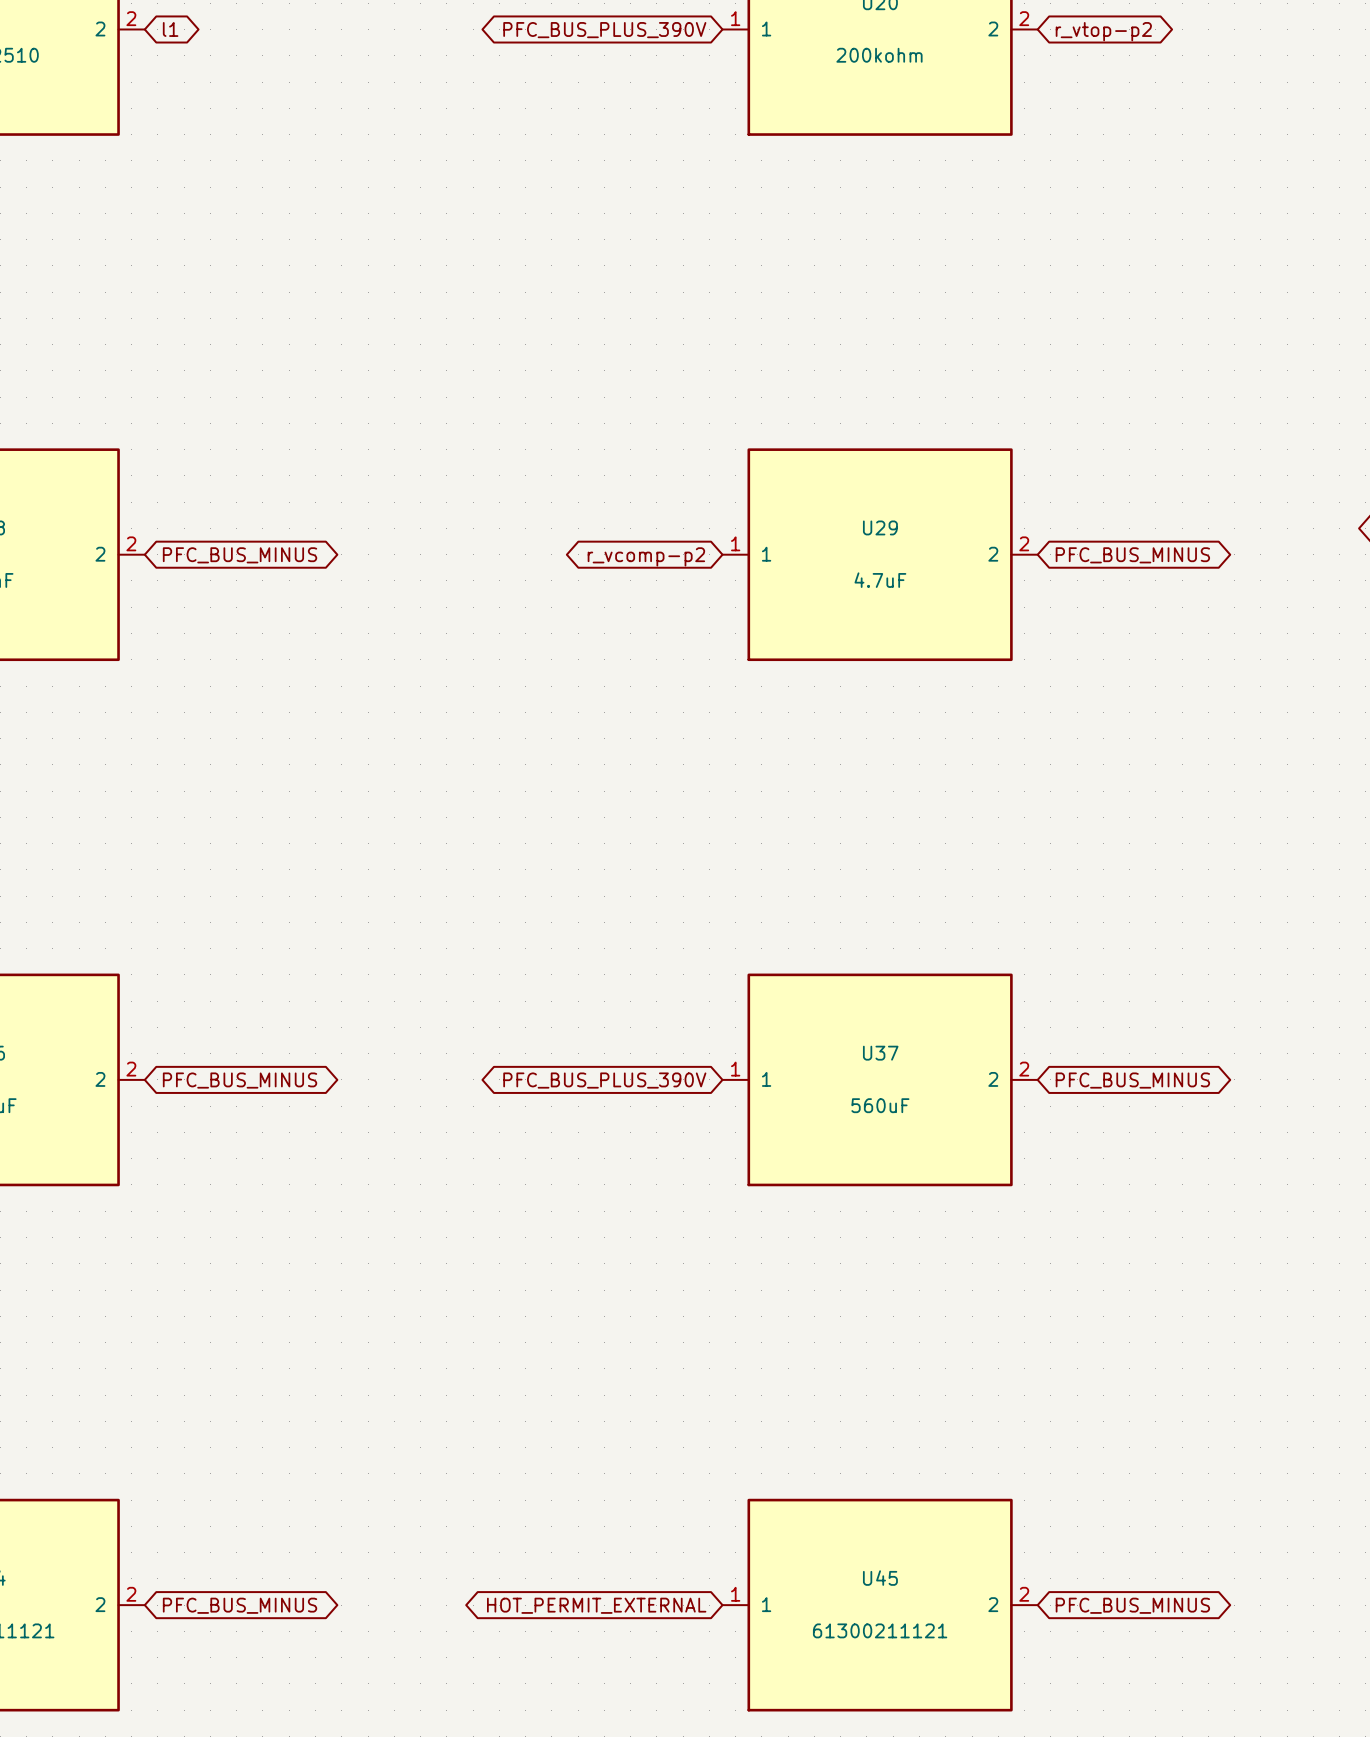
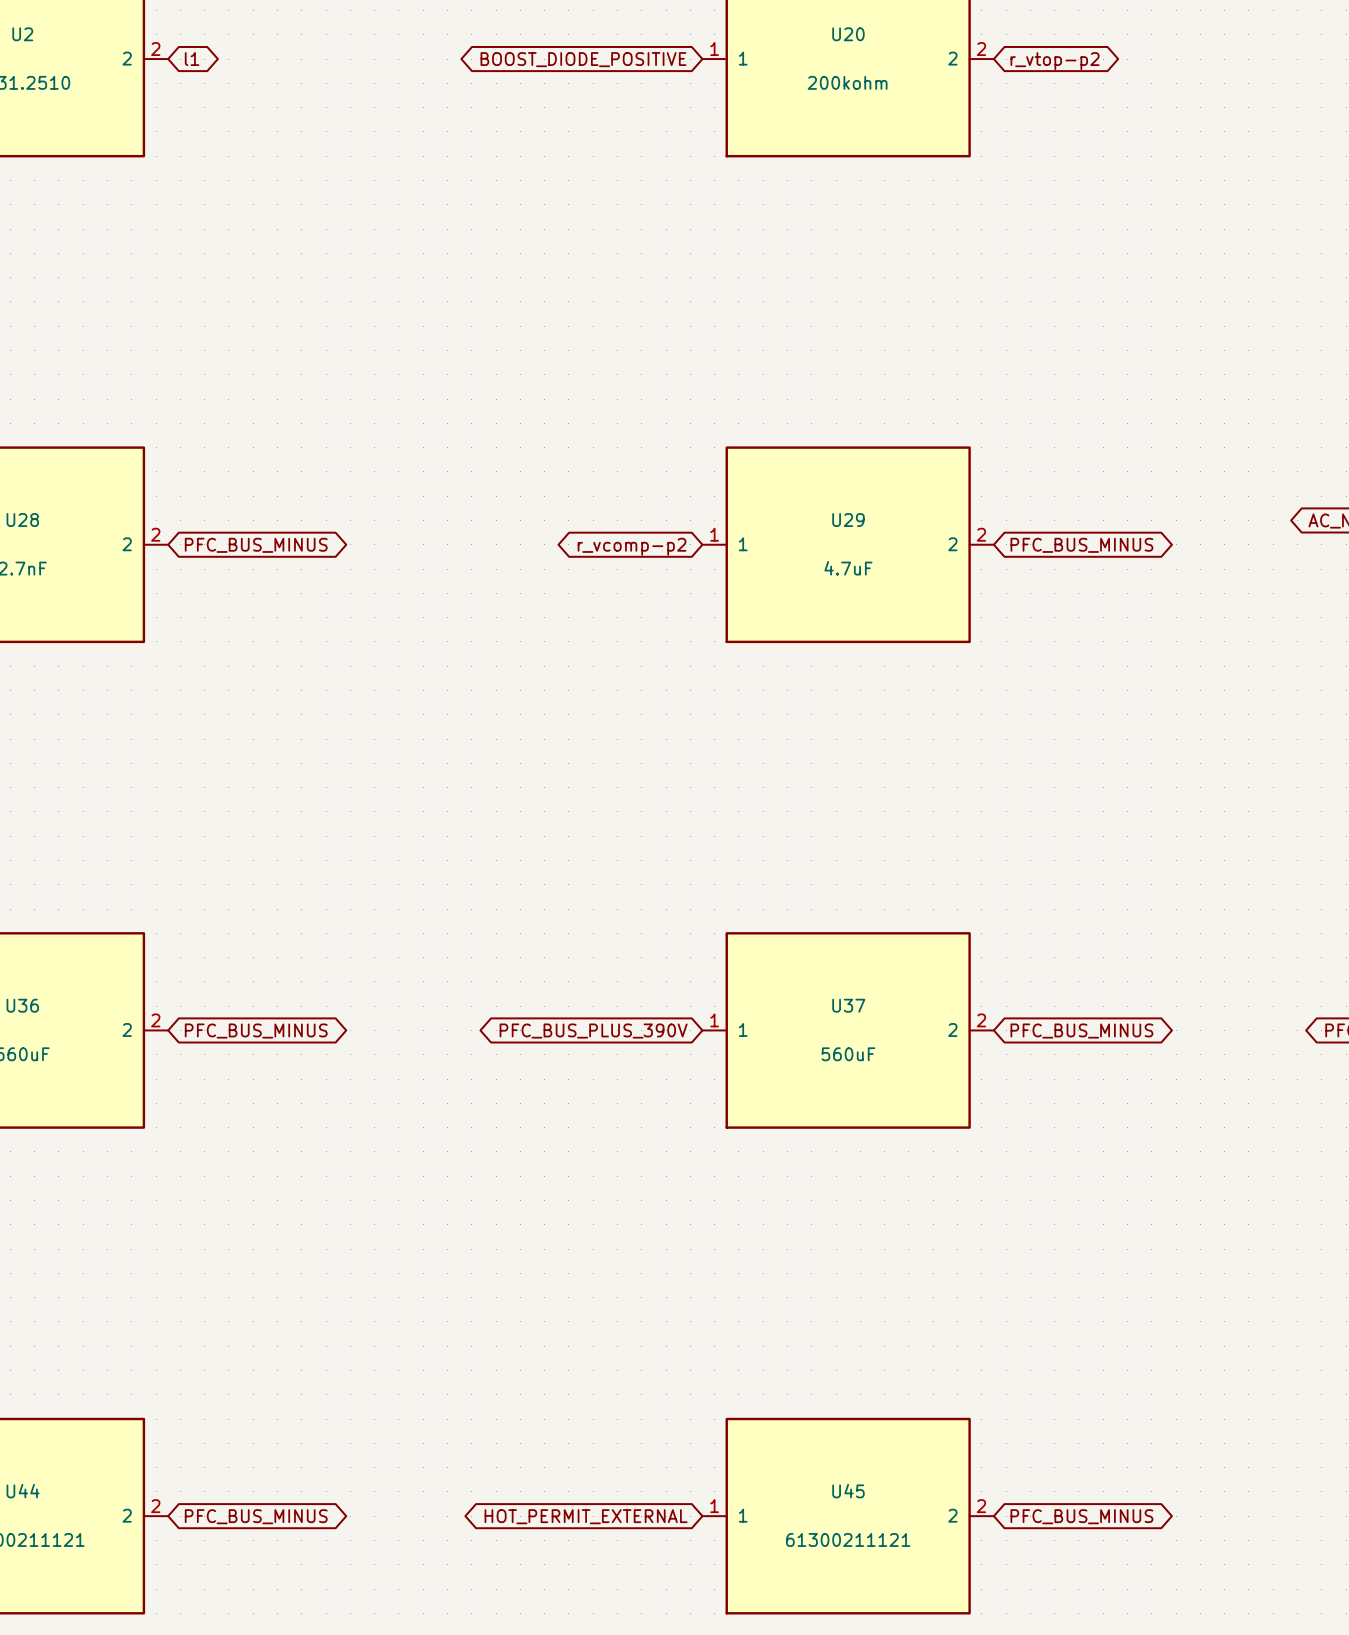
global label: PFC_BUS_PLUS_390V (604, 30) -> BOOST_DIODE_POSITIVE (583, 59)

